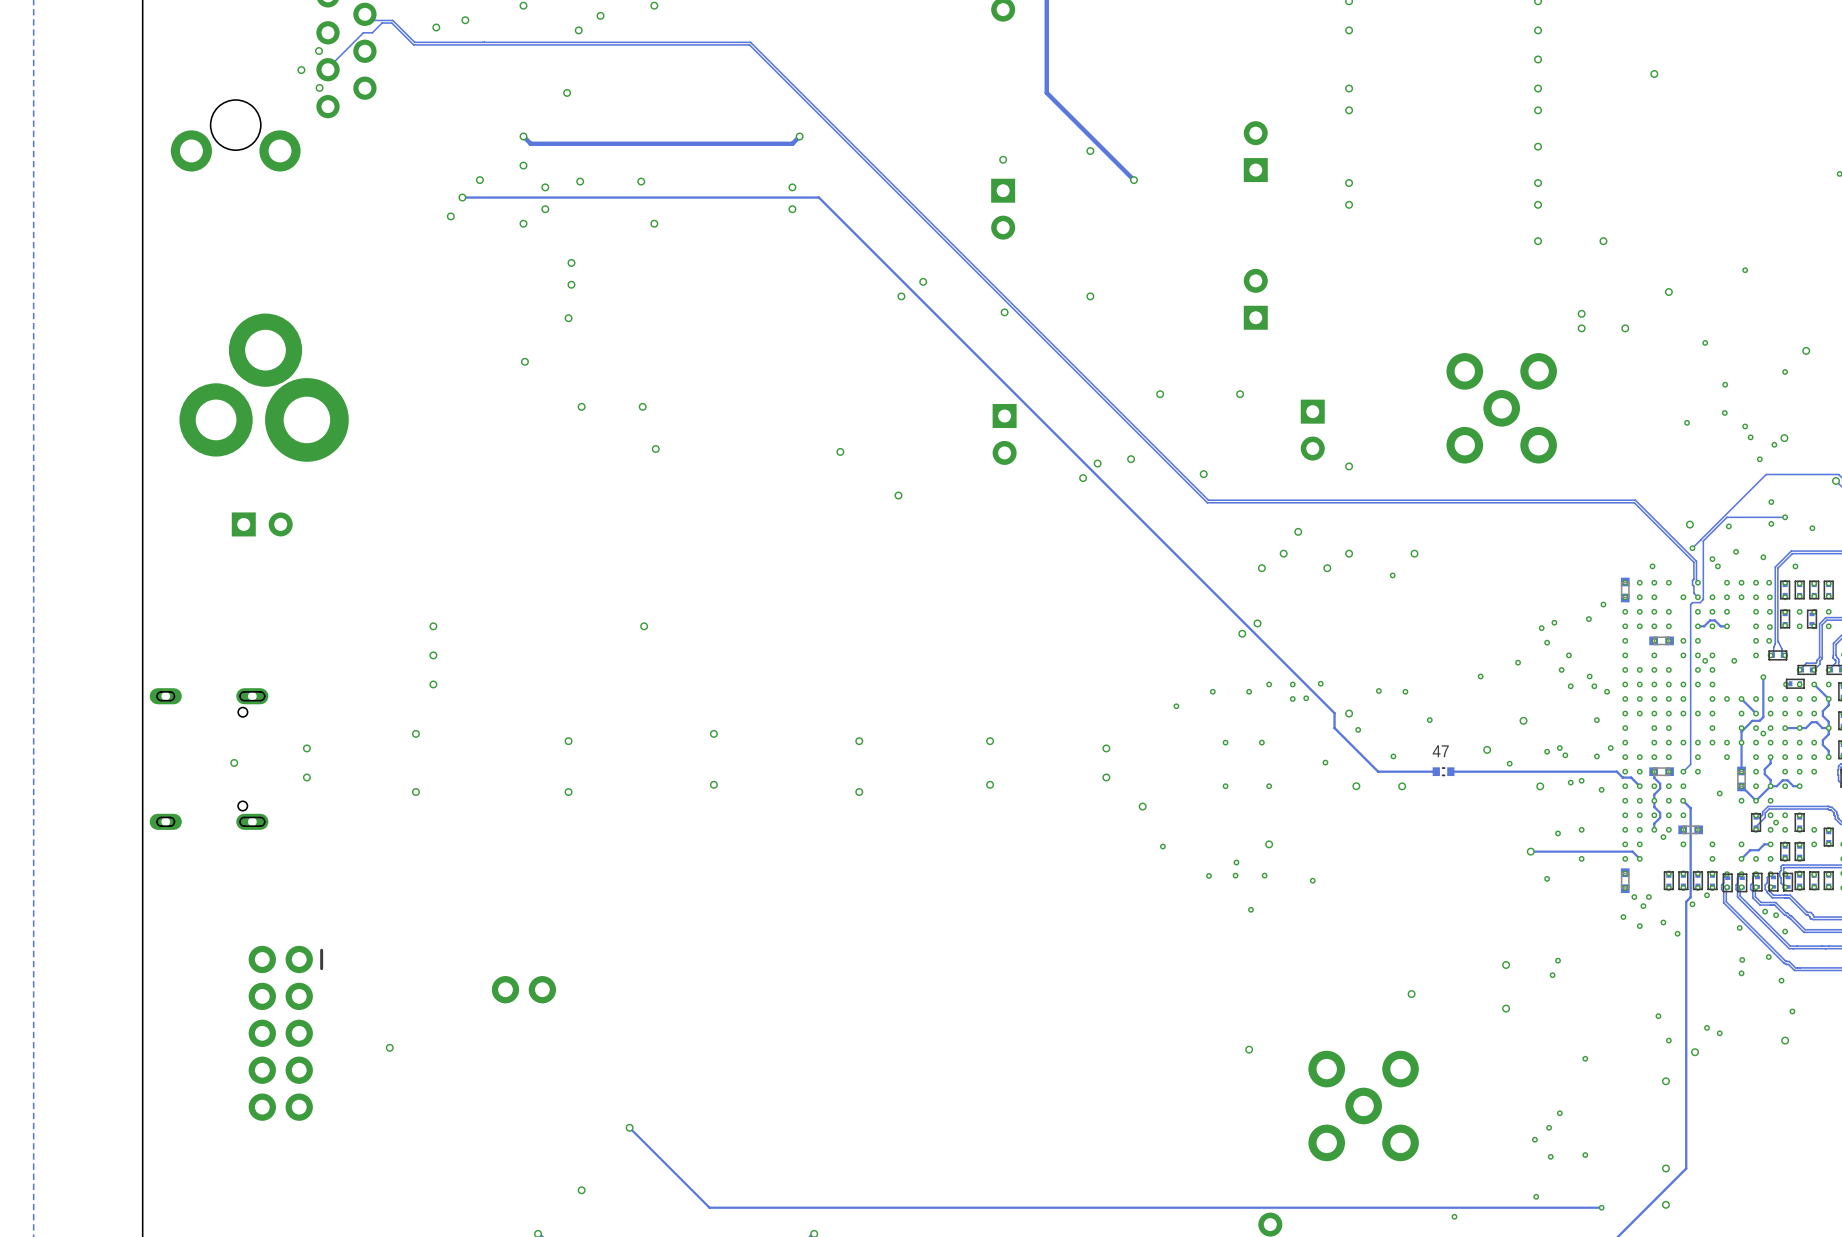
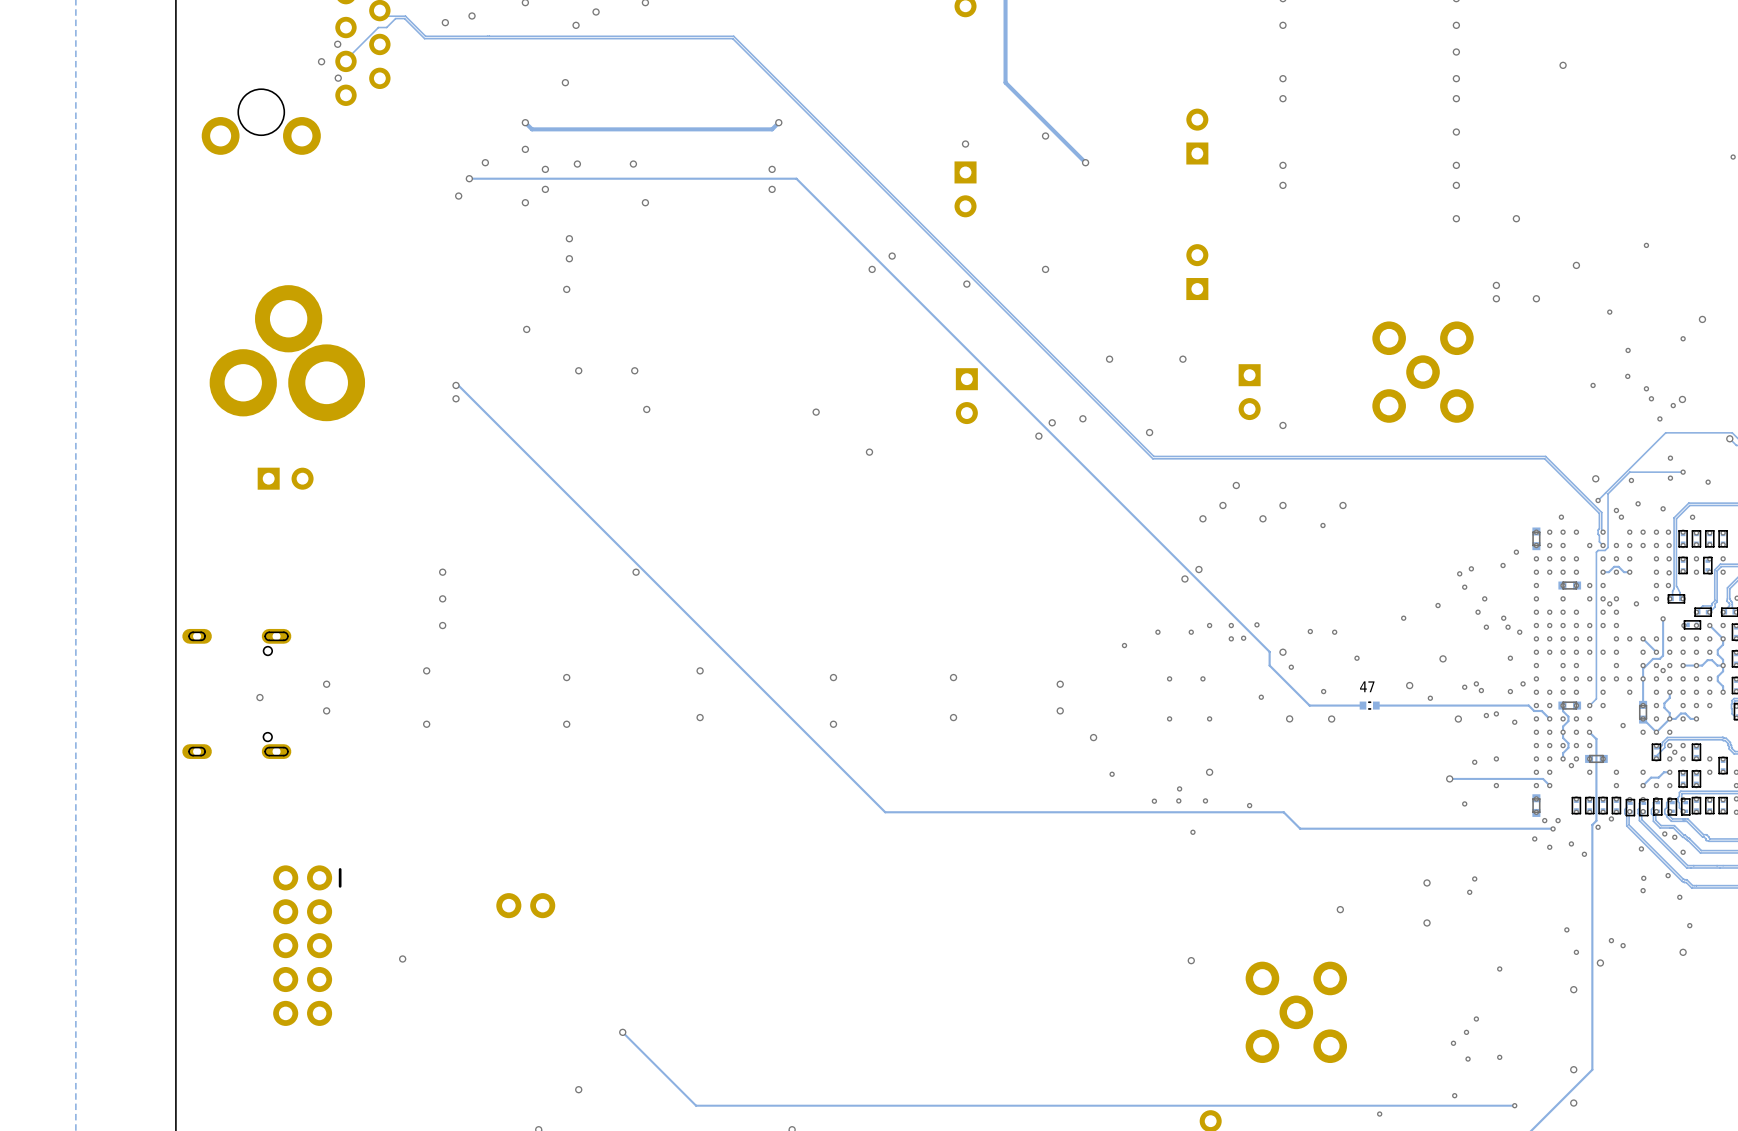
track: none -> (456, 385) (458, 385) (885, 812) (1283, 812) (1300, 828) (1553, 828)
via: none -> (456, 385)
via: none -> (456, 398)

